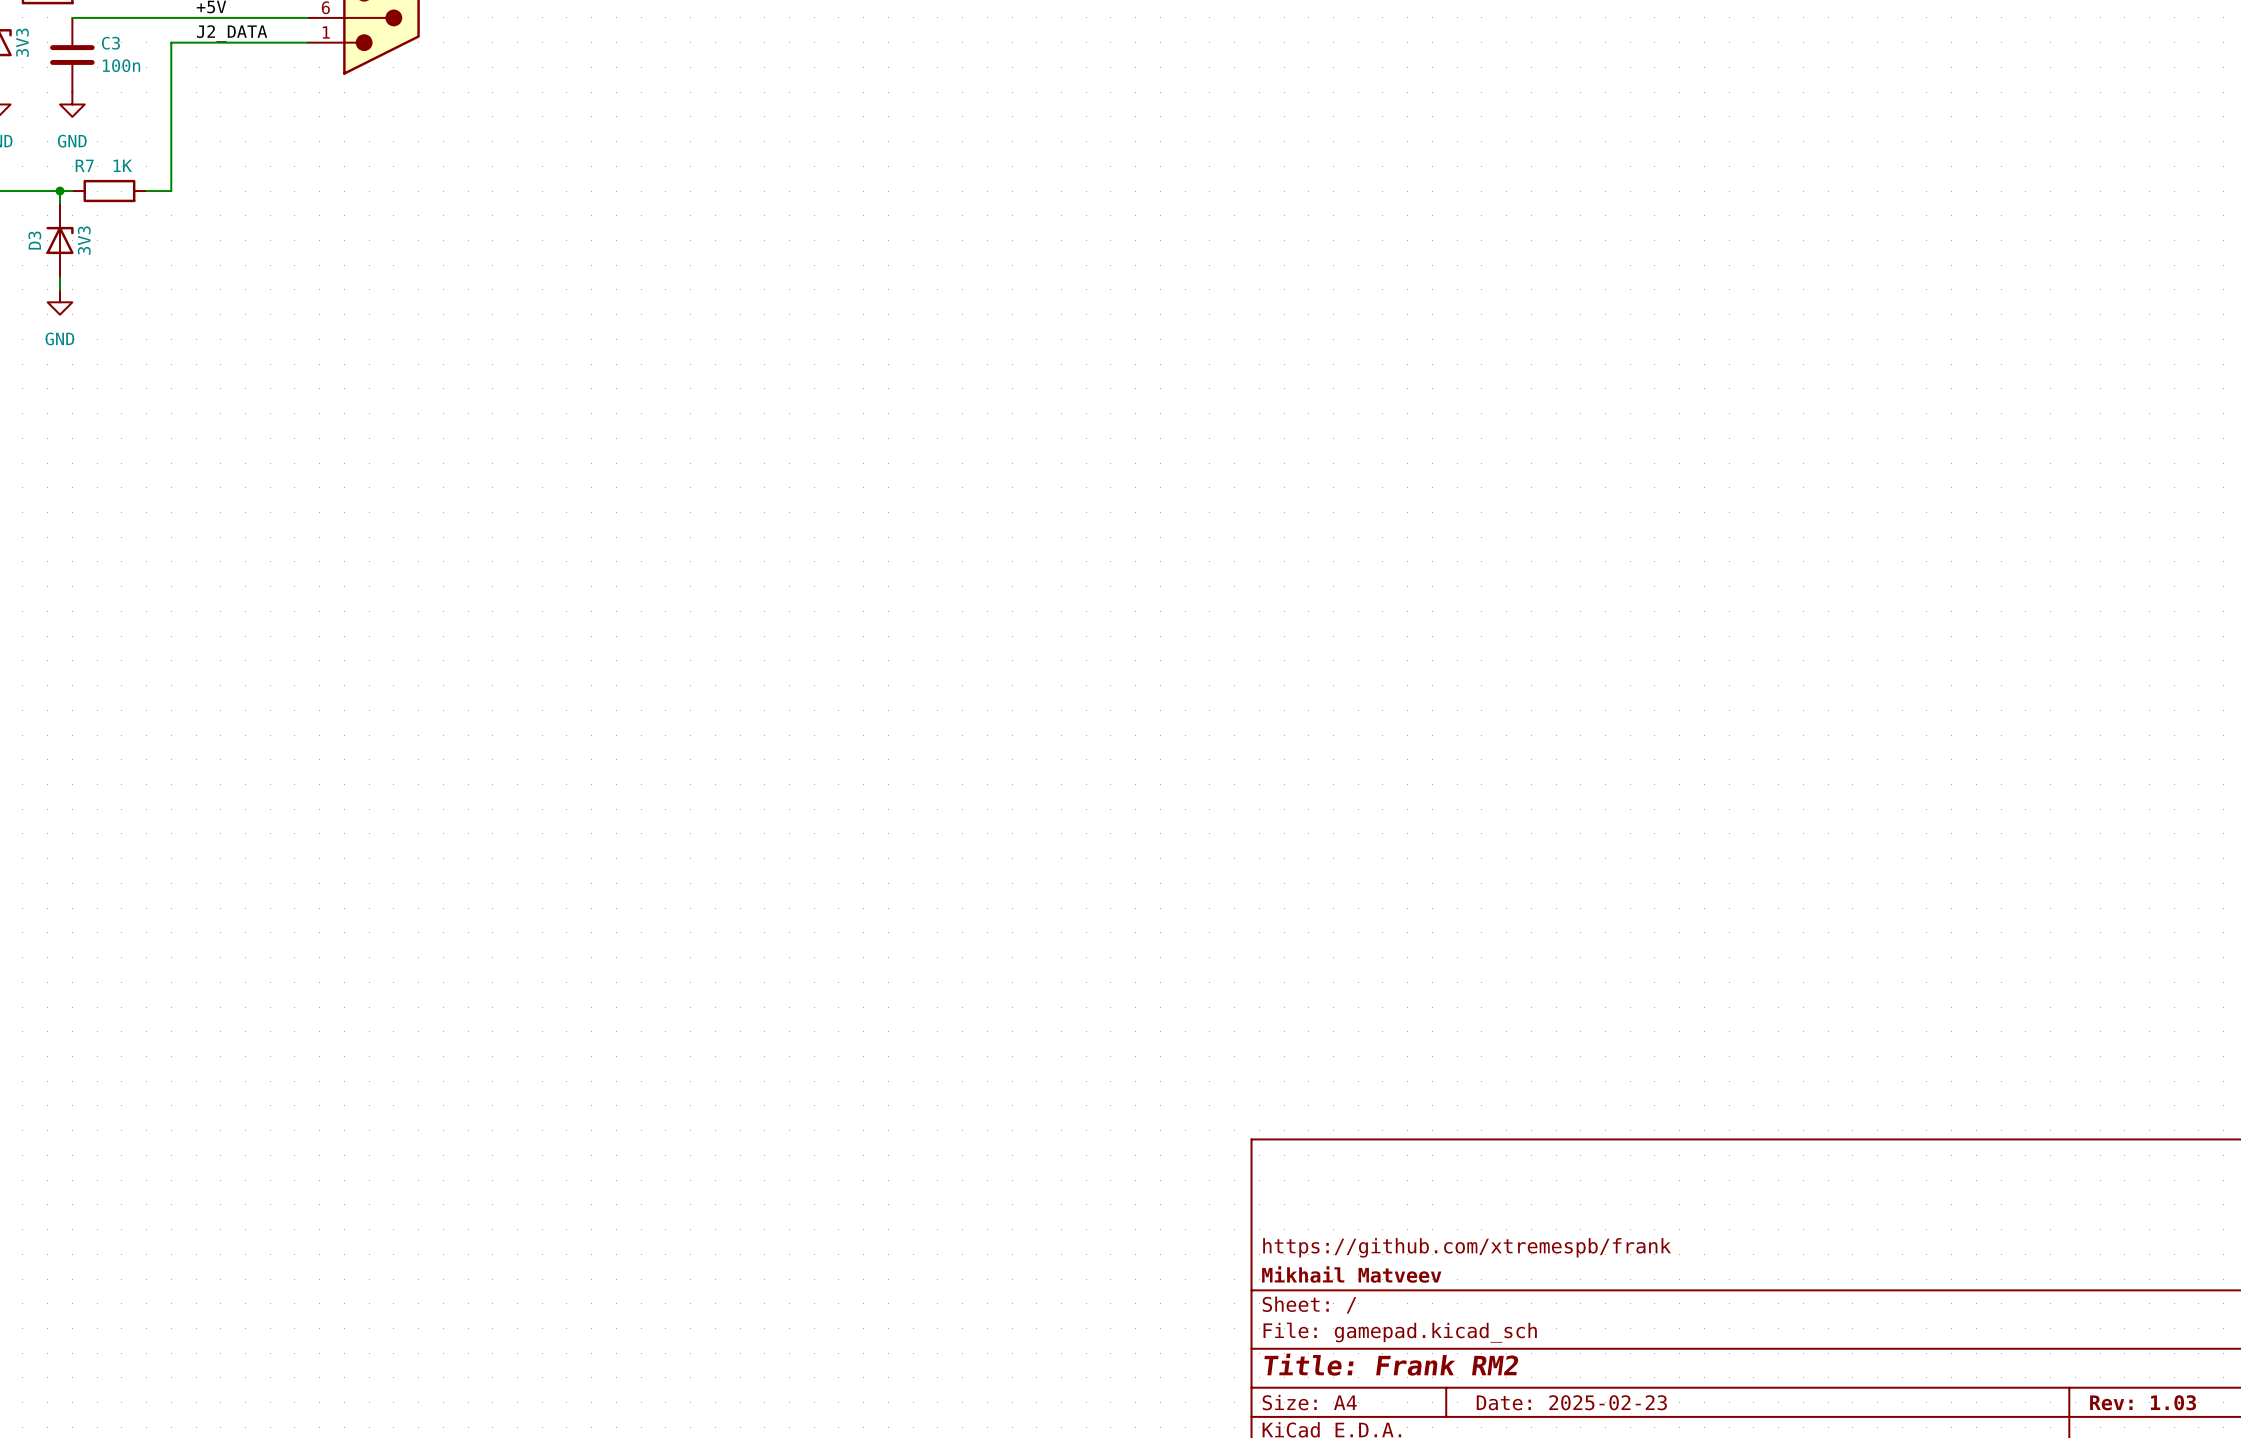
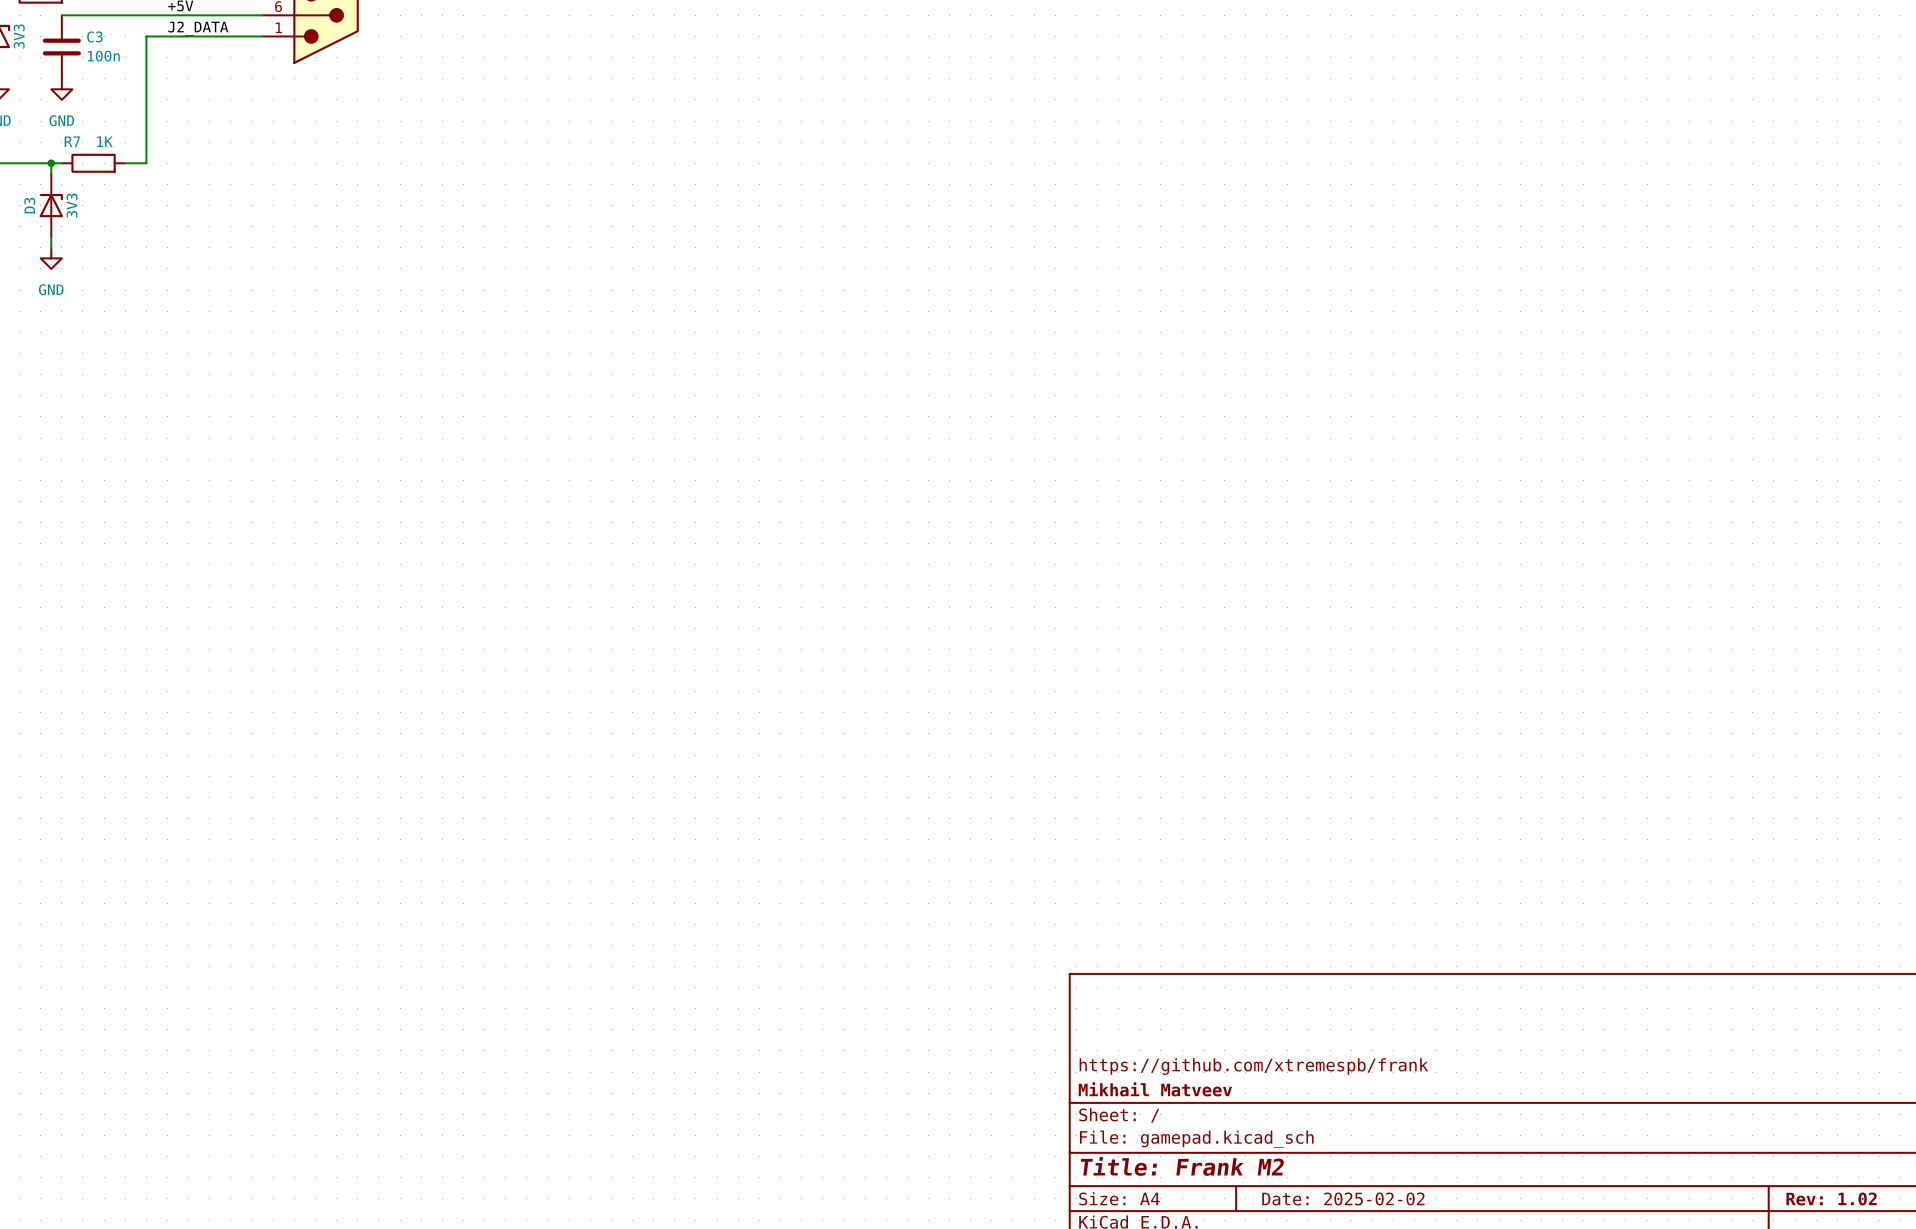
title block: Title: Frank RM2 (1391, 1364) -> Title: Frank M2 (1182, 1166)
title block: Date: 2025-02-23 (1571, 1402) -> Date: 2025-02-02 (1343, 1198)
title block: Rev: 1.03 (2143, 1402) -> Rev: 1.02 (1831, 1198)

